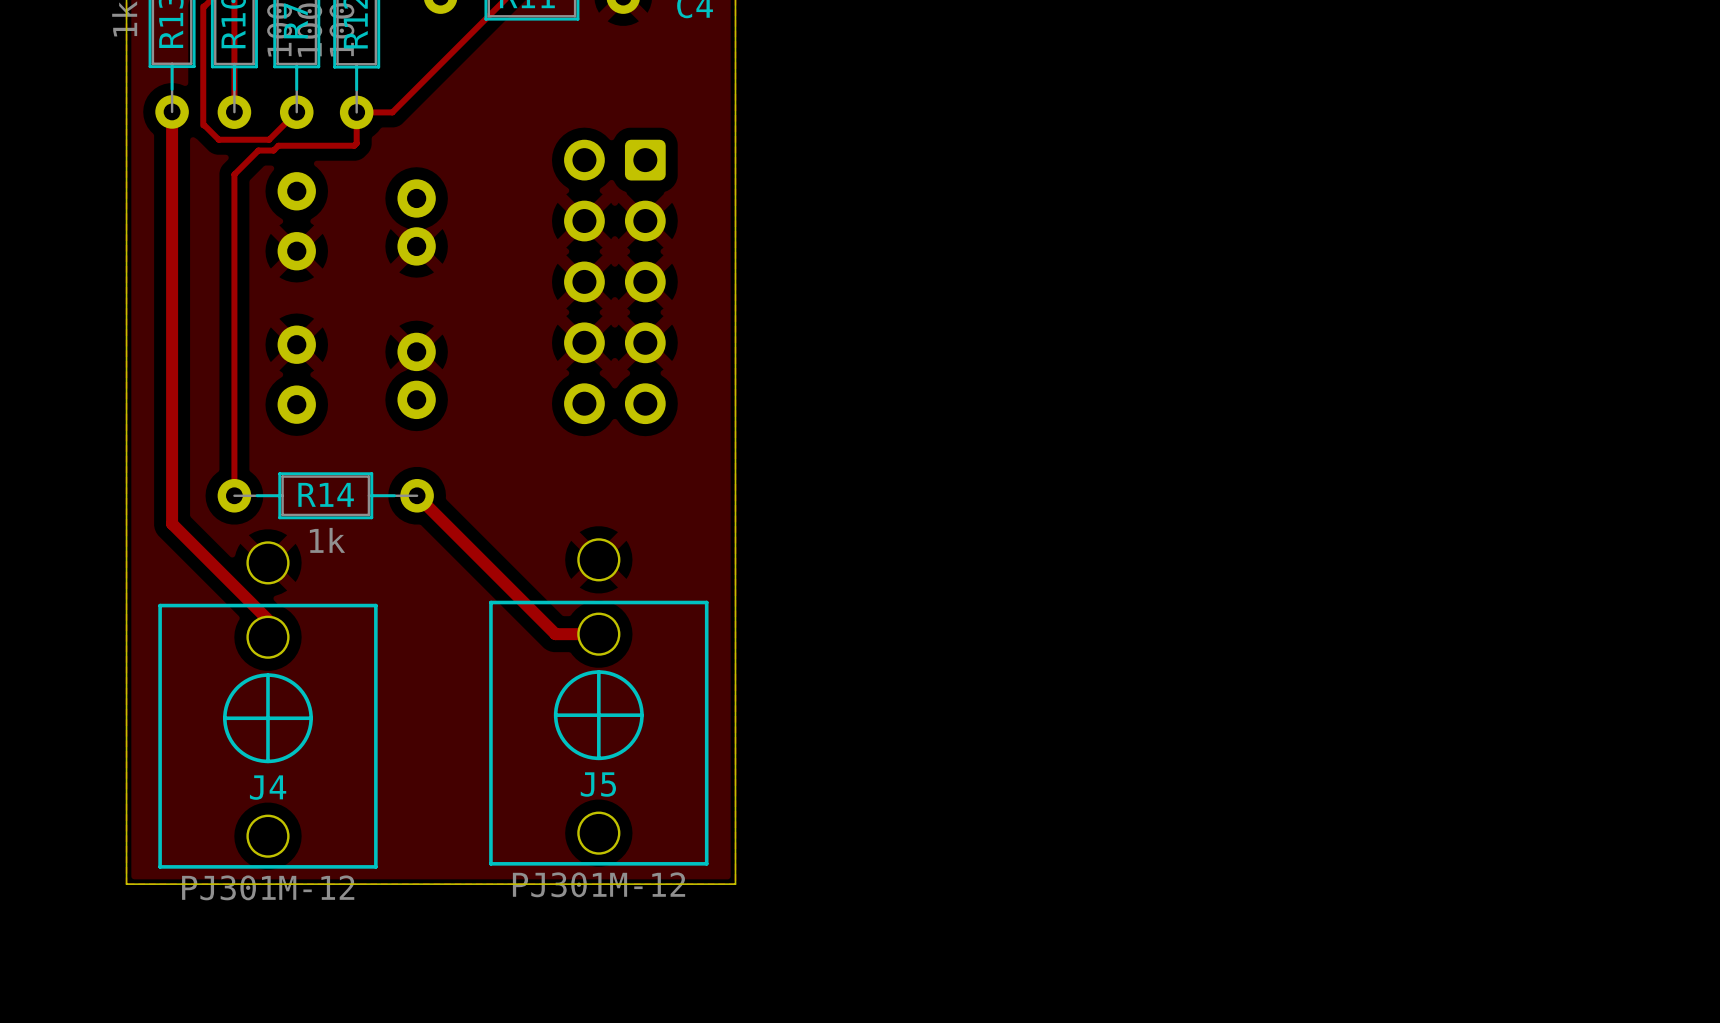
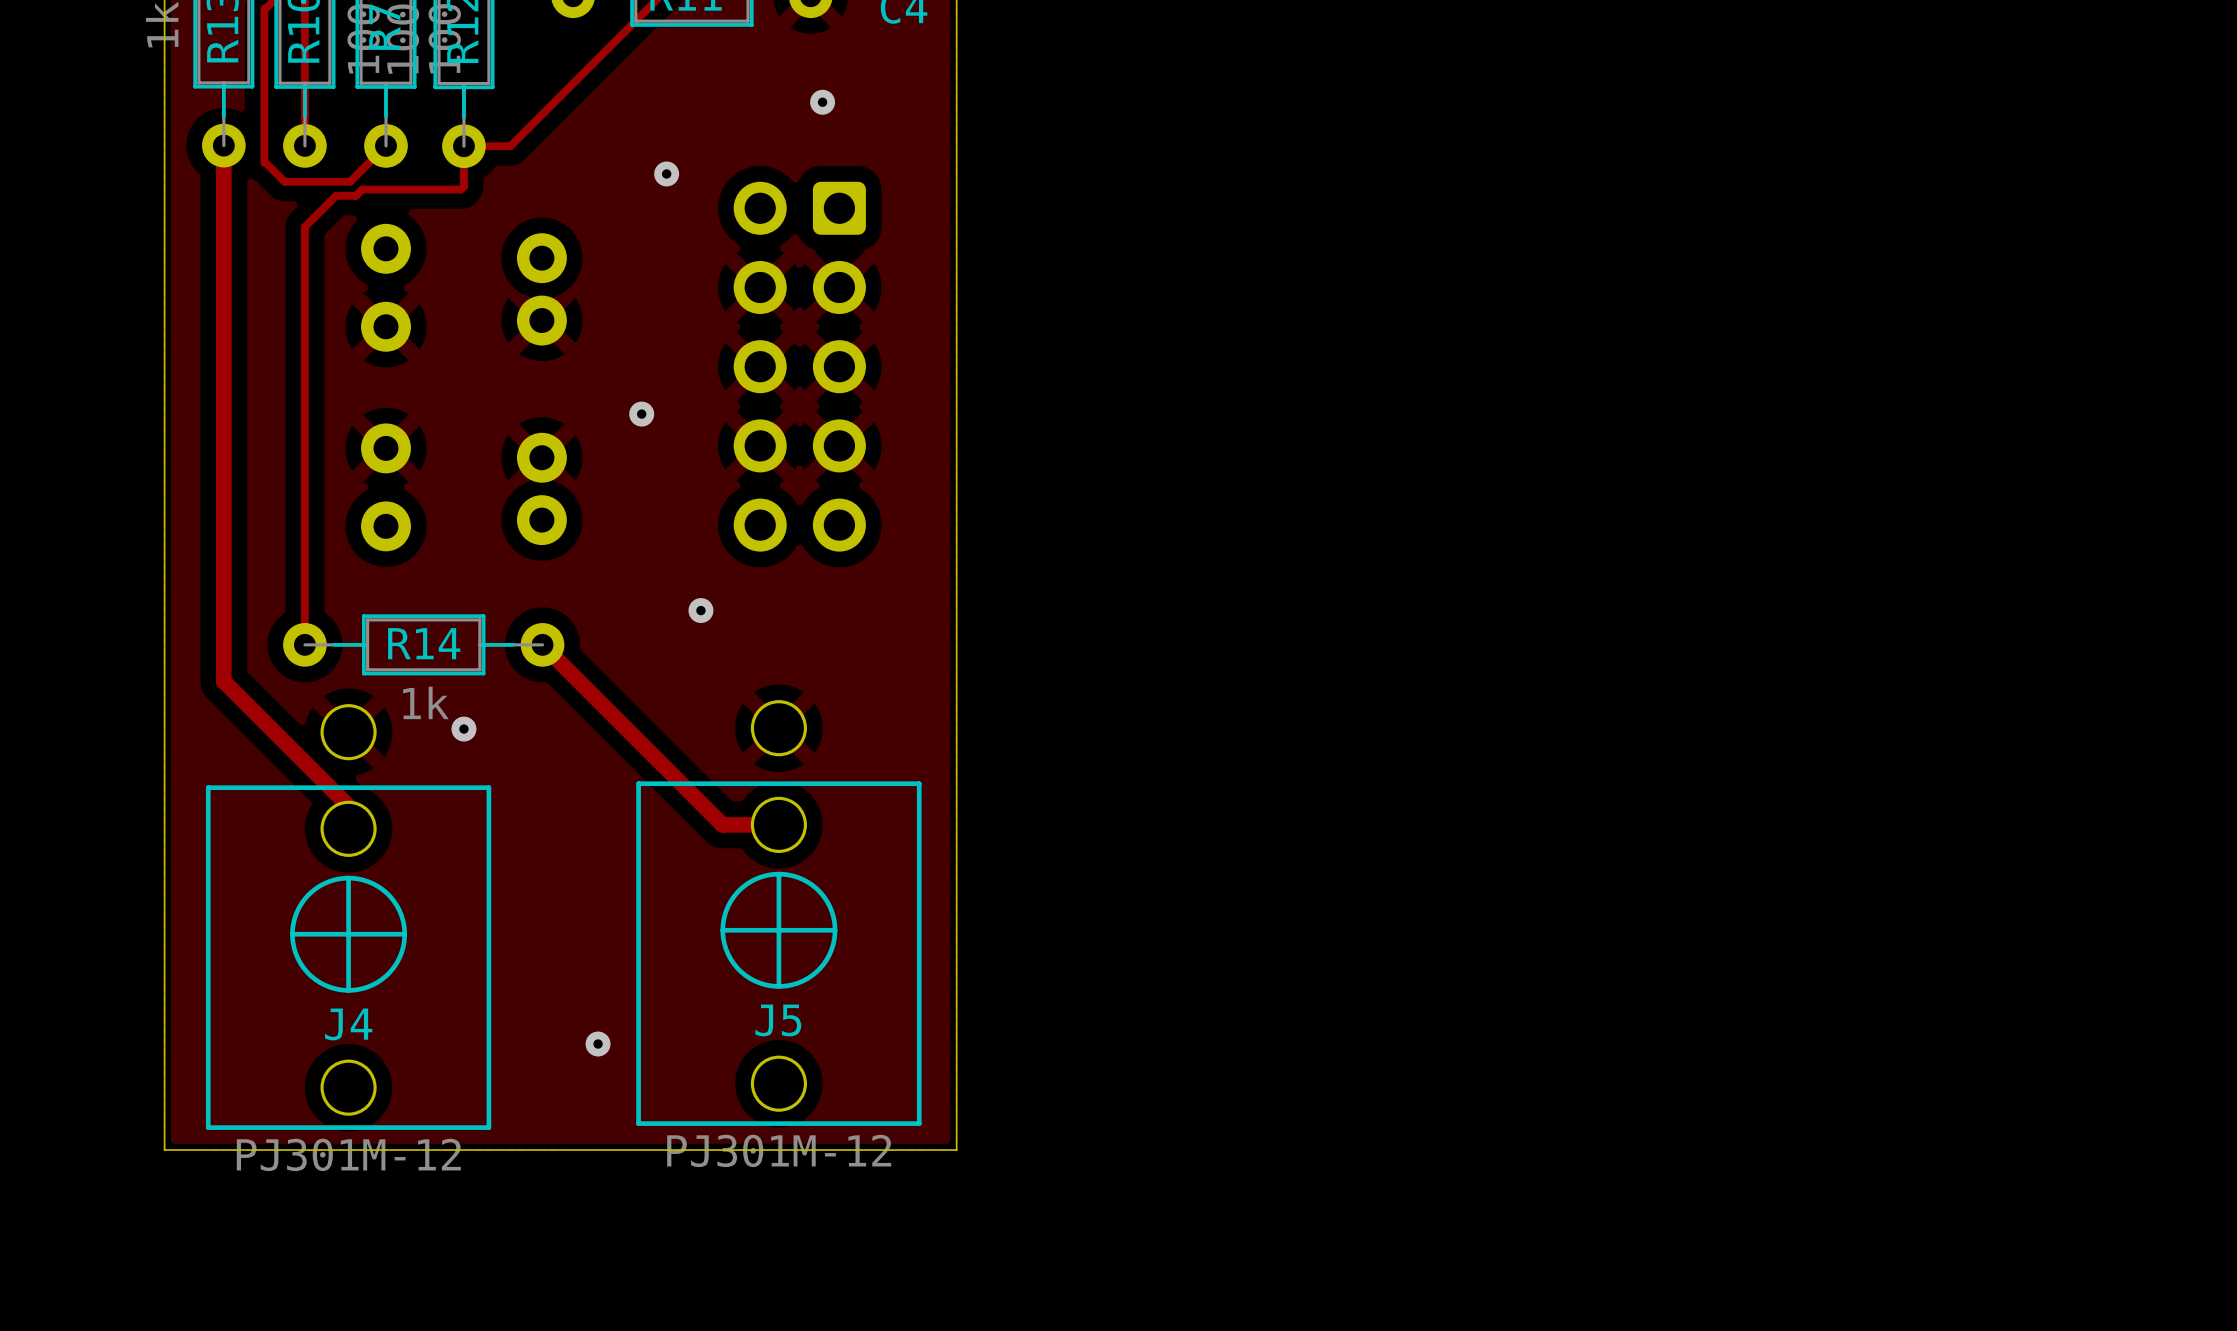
via: none -> (822, 102)
via: none -> (666, 173)
via: none -> (641, 414)
via: none -> (700, 610)
via: none -> (463, 729)
via: none -> (598, 1044)

